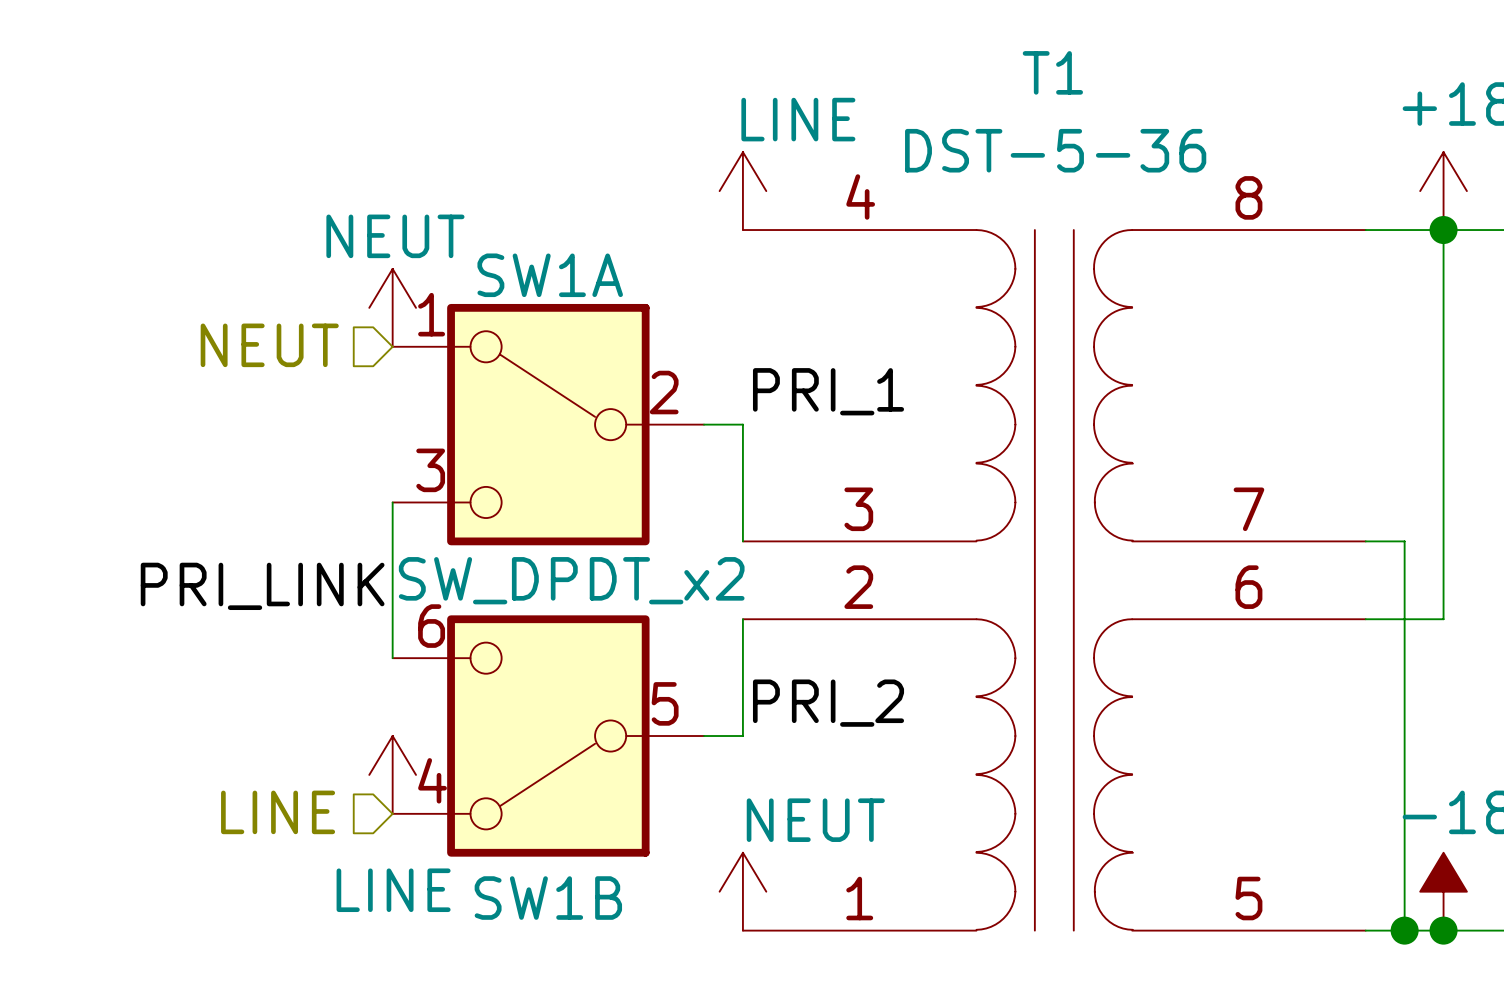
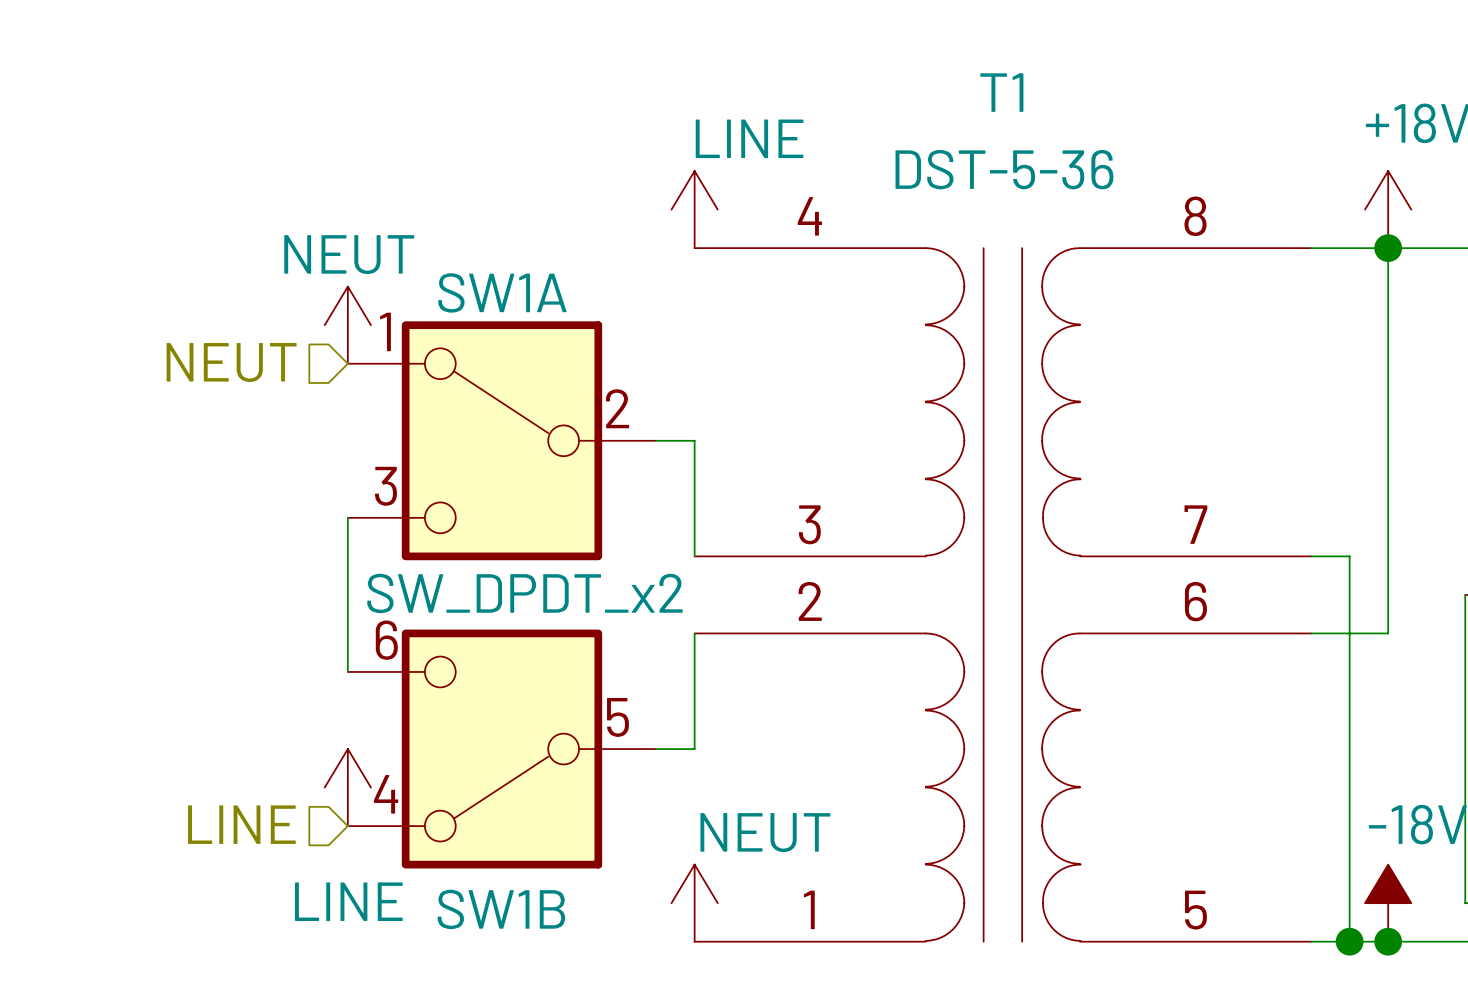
label: PRI_1 (828, 391) -> none
label: PRI_LINK (262, 586) -> none
label: PRI_2 (828, 703) -> none

